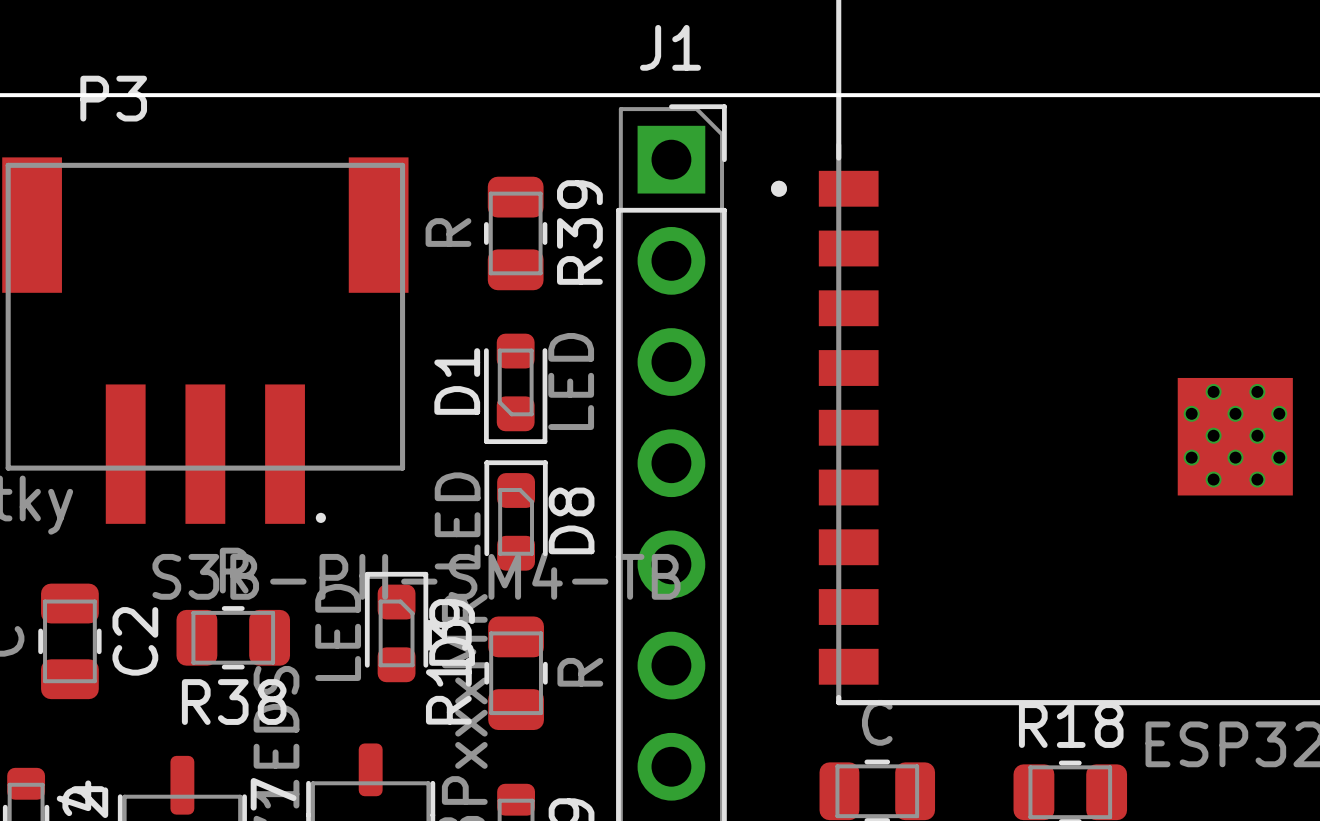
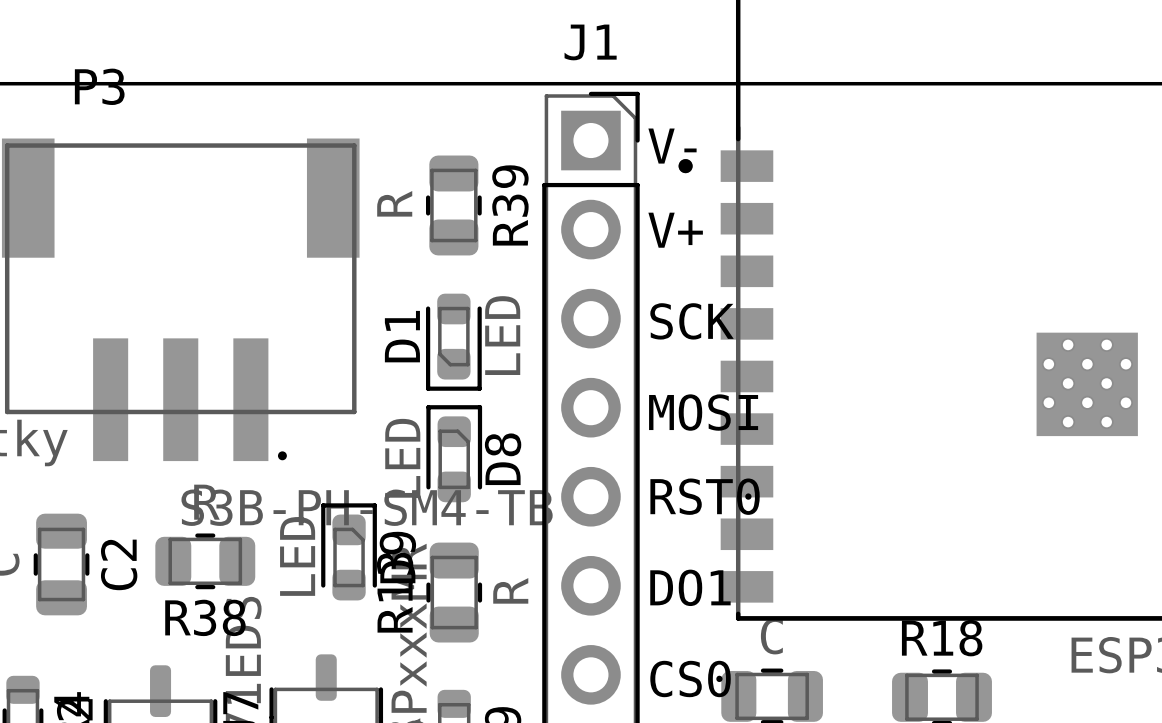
text: none -> V- (672, 146)
text: none -> V+ (675, 230)
text: none -> SCK (692, 321)
text: none -> MOSI (703, 412)
text: none -> RST0 (705, 496)
text: none -> DO1 (690, 587)
text: none -> CS0 (690, 679)

